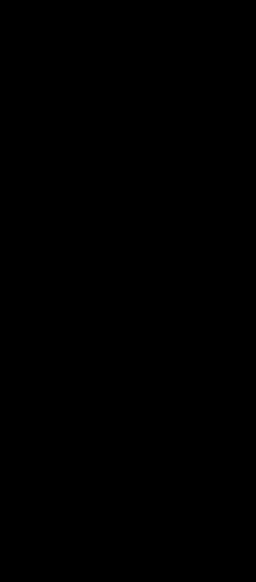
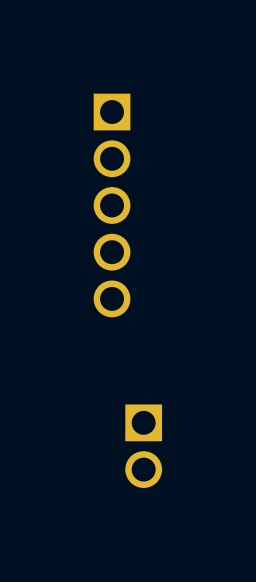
part: none -> (112, 205)
part: none -> (143, 446)

